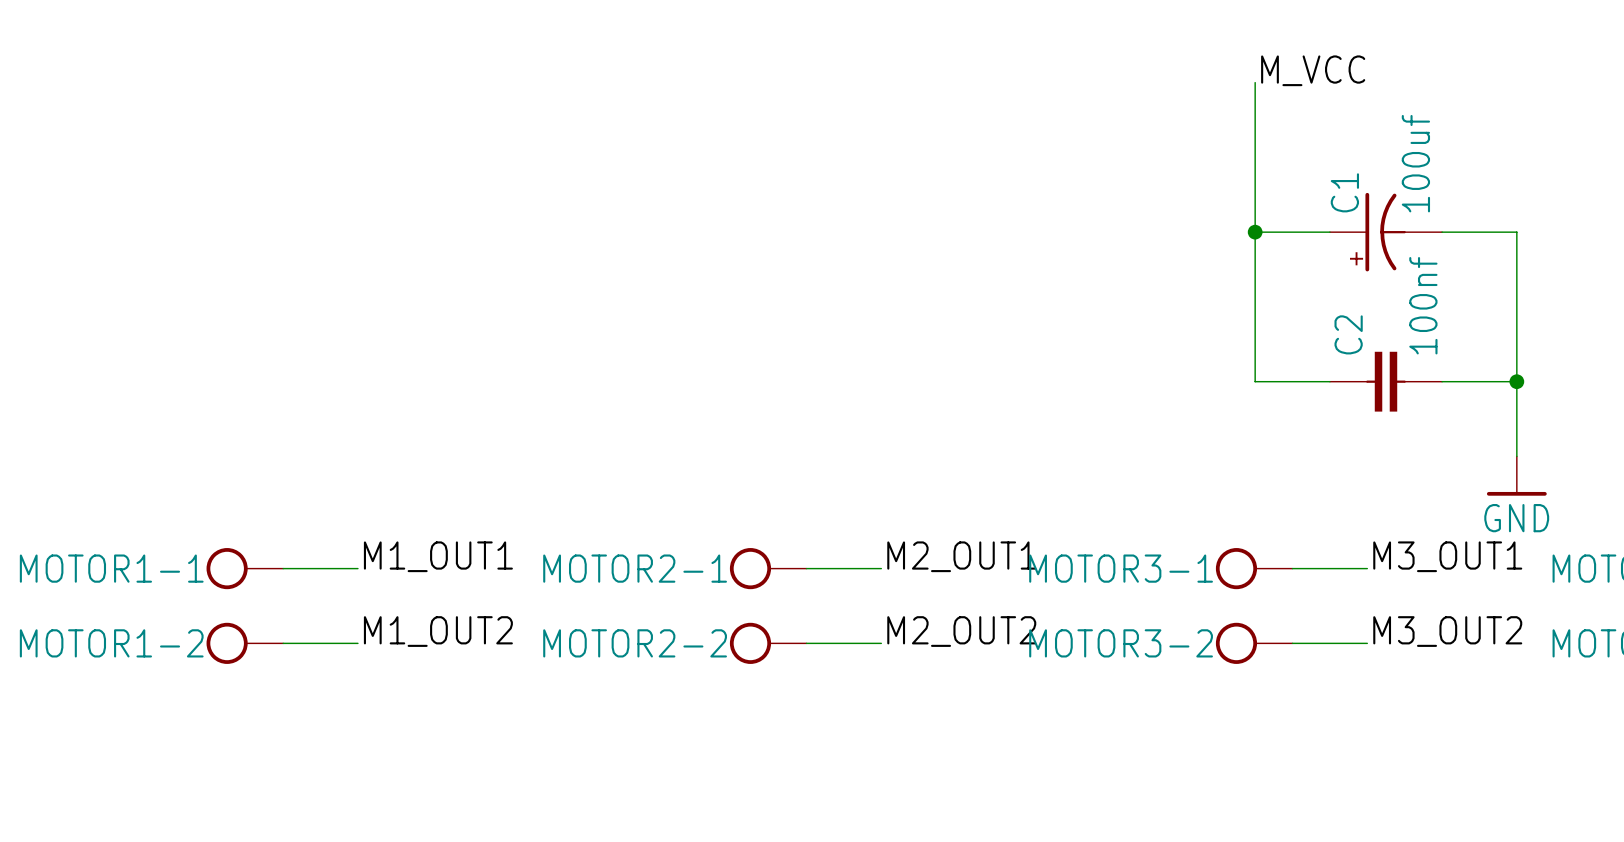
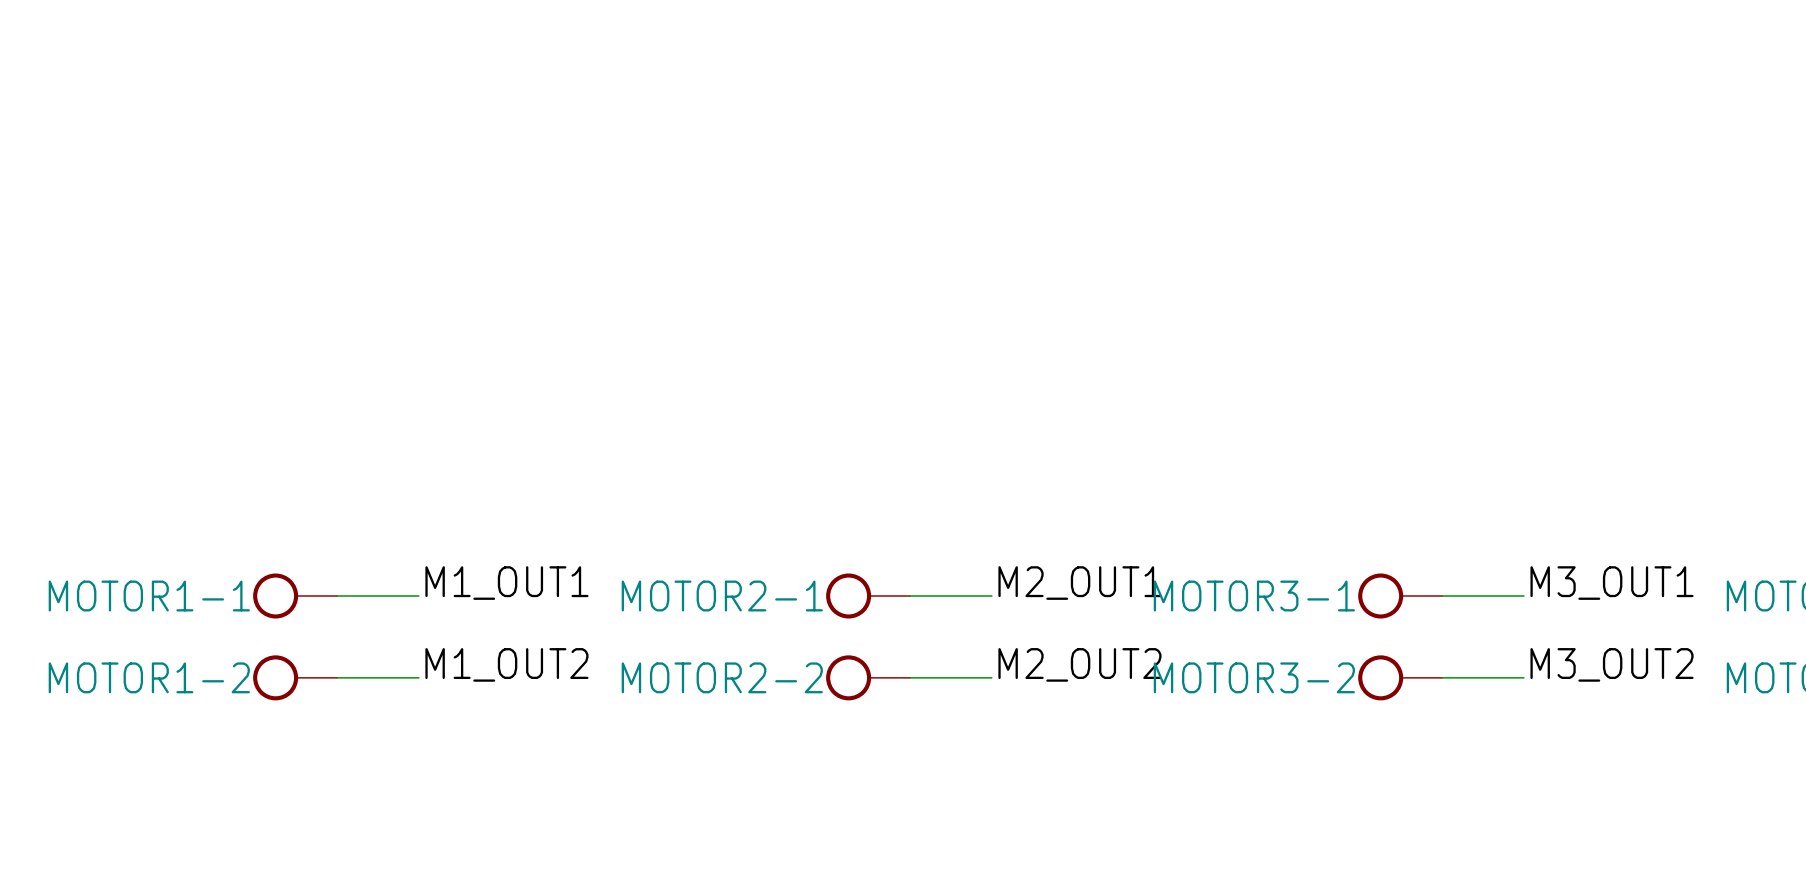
label: M_VCC (1313, 70) -> none
wire: (1255, 82) (1255, 381) (1329, 381) -> none
wire: (1255, 232) (1329, 232) -> none
junction: (1255, 232) -> none
C1: 100uf (1386, 232) -> none
wire: (1442, 232) (1516, 232) (1516, 456) -> none
C2: 100nf (1386, 381) -> none
wire: (1442, 381) (1516, 381) -> none
junction: (1516, 381) -> none
power symbol: GND (1516, 476) -> none

